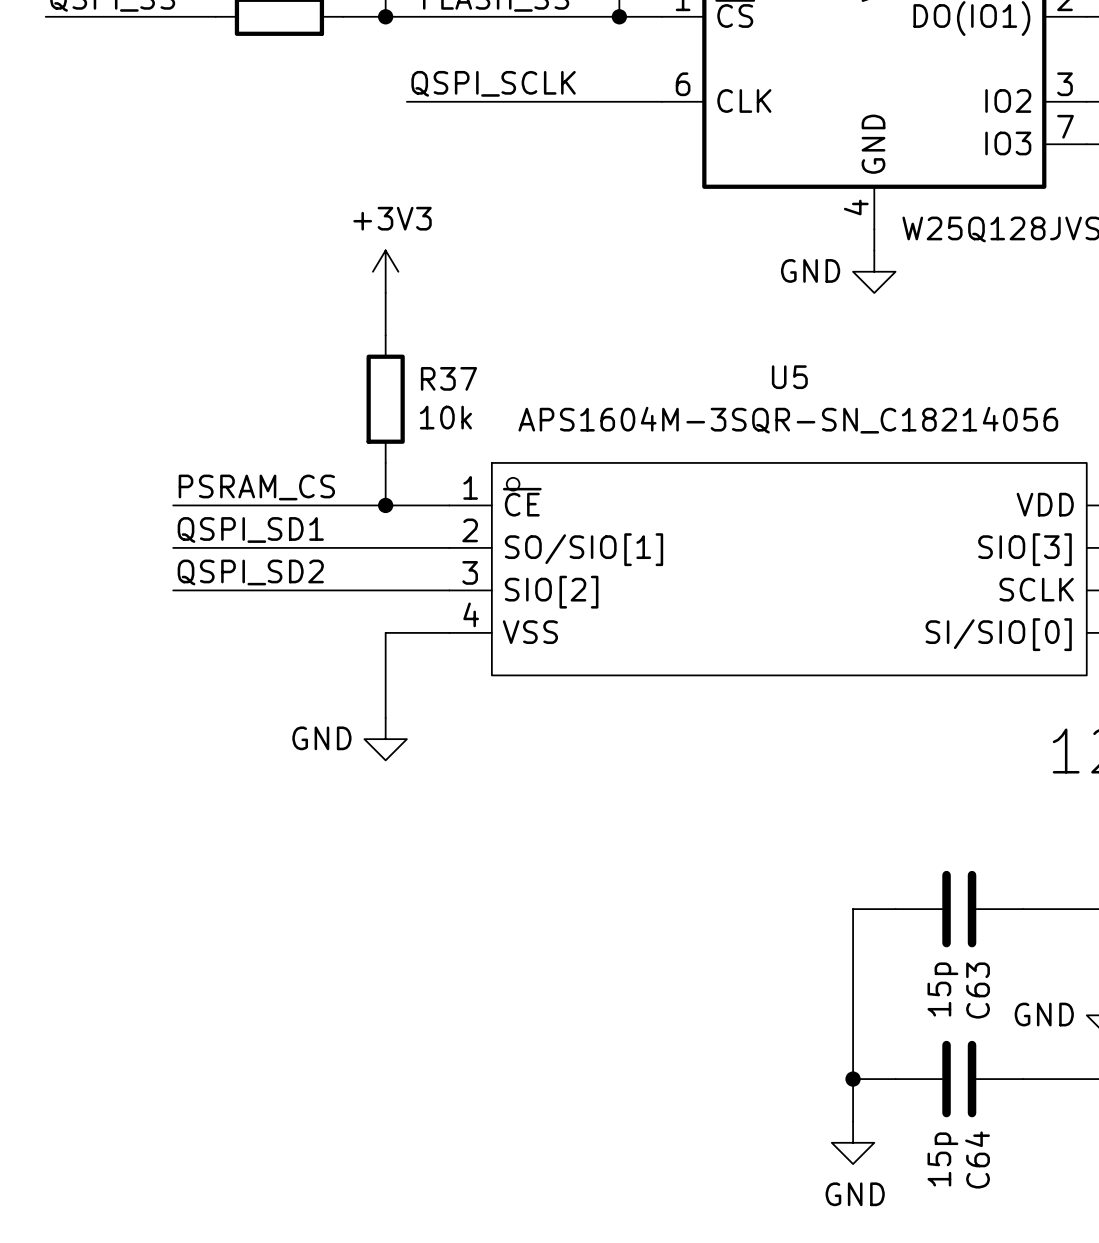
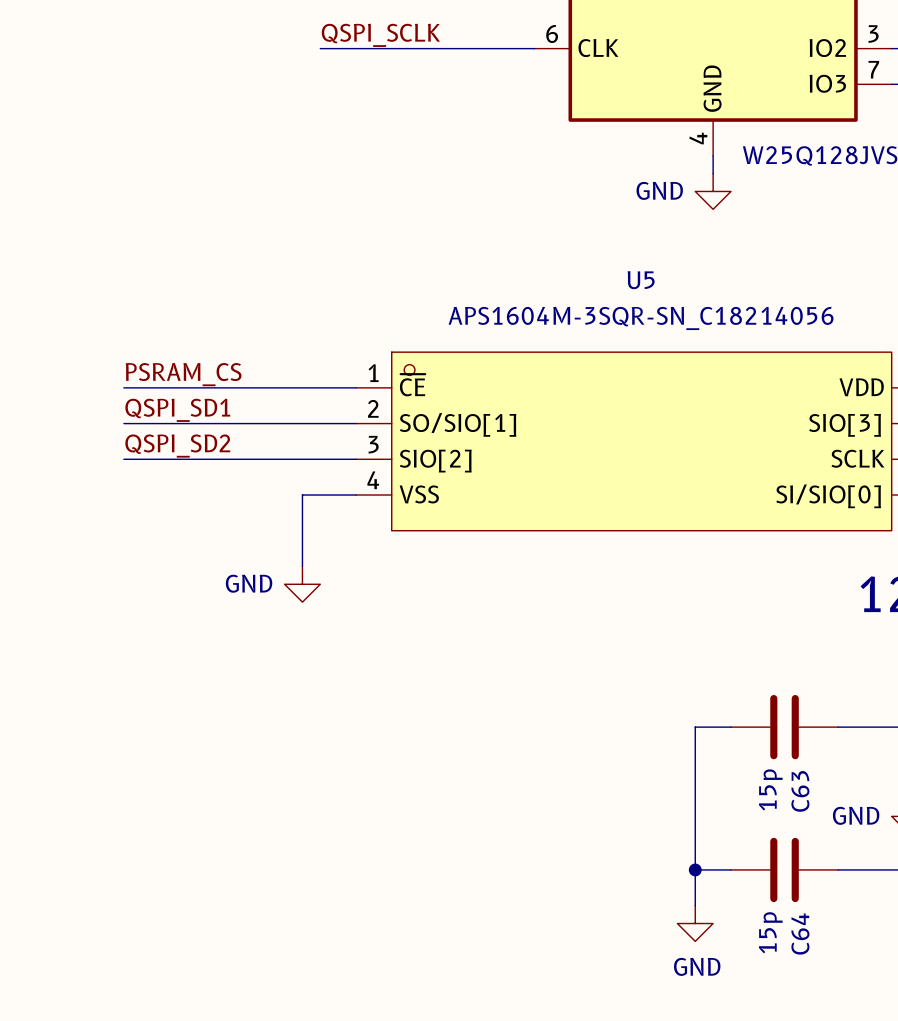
power symbol: +3V3 (385, 271) -> none
wire: (385, 292) (385, 335) -> none
R37: 10k (385, 399) -> none
wire: (385, 462) (385, 505) -> none
junction: (385, 505) -> none

